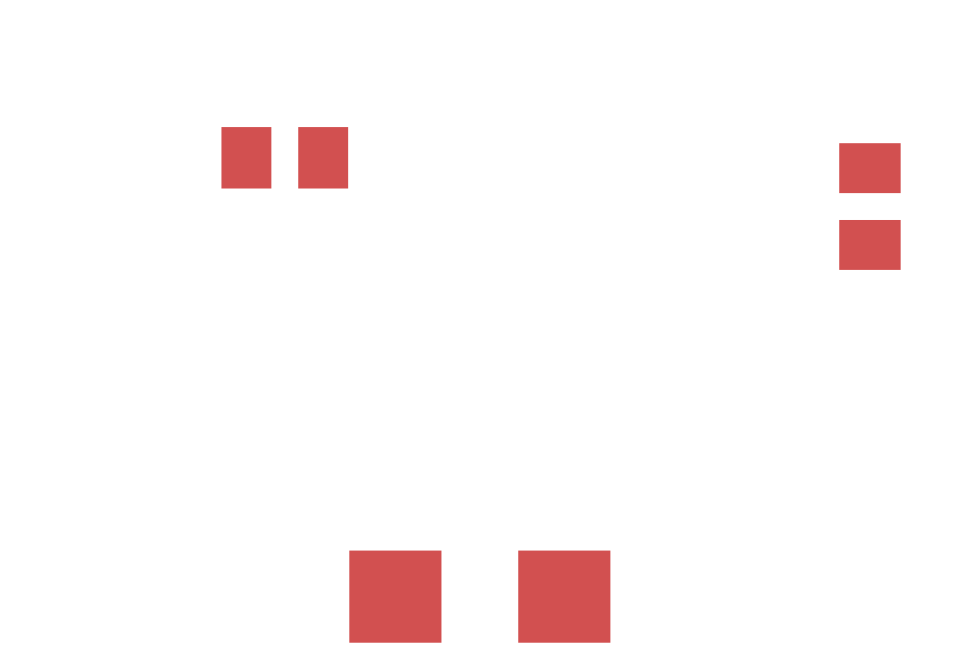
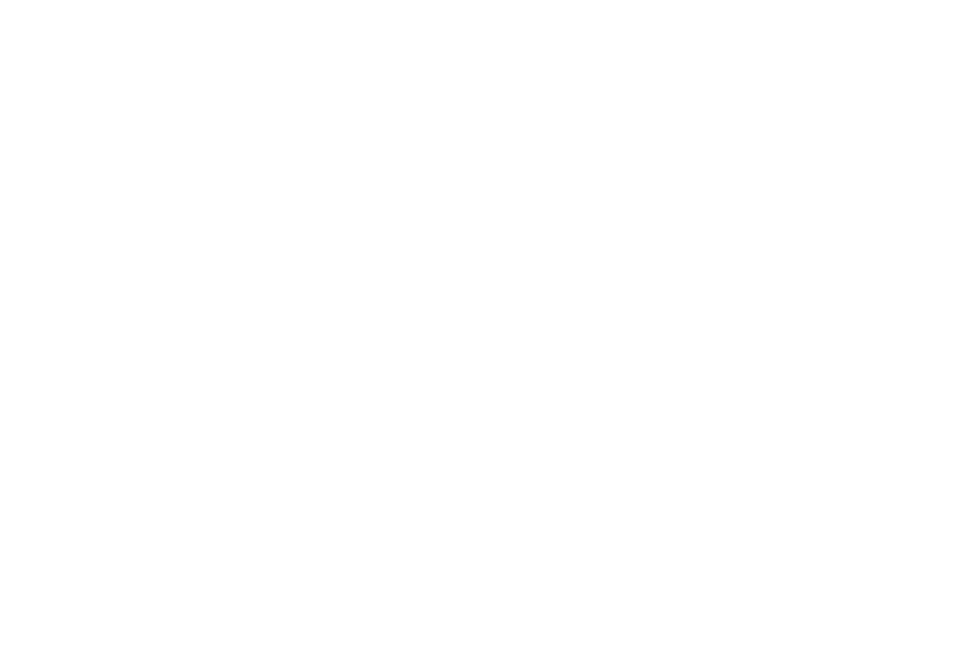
part: (284, 157) -> none
part: (869, 206) -> none
part: (479, 596) -> none

